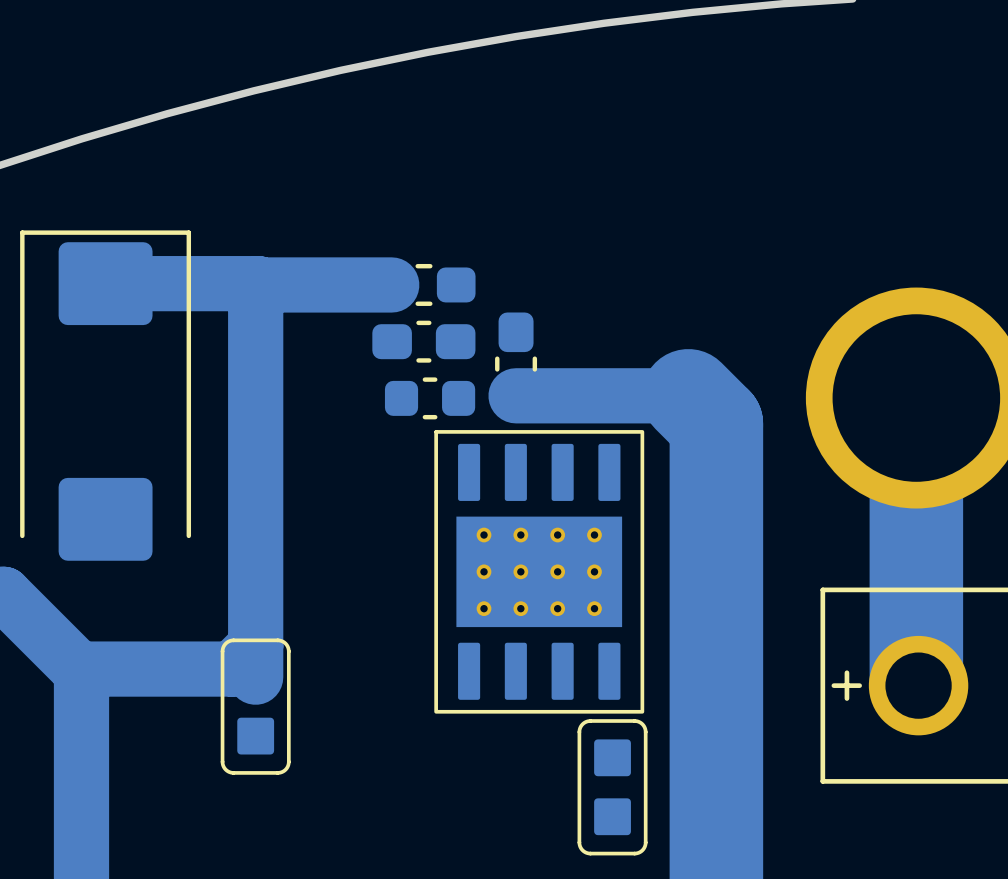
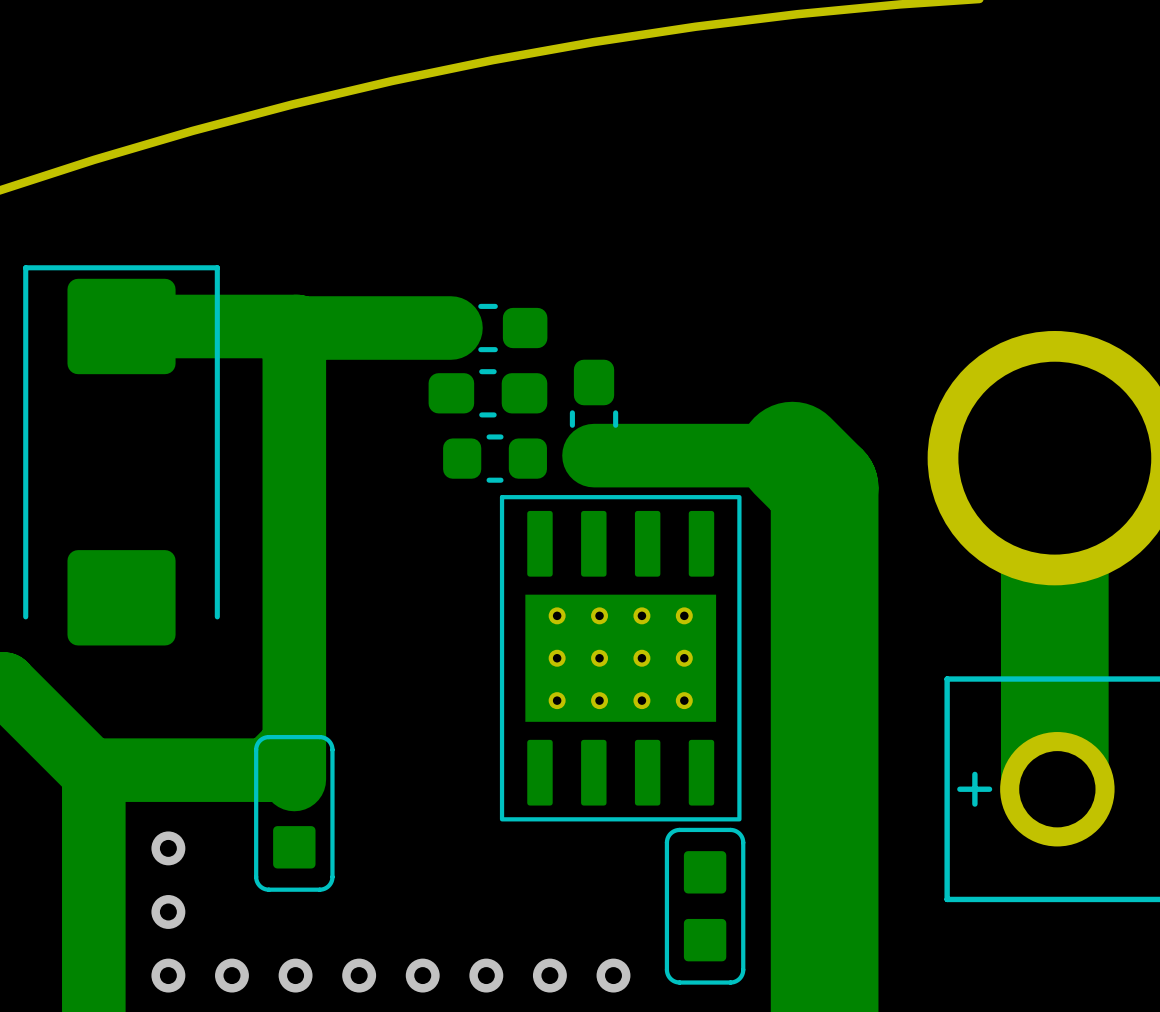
via: none -> (168, 848)
via: none -> (168, 911)
via: none -> (168, 975)
via: none -> (231, 975)
via: none -> (295, 975)
via: none -> (359, 975)
via: none -> (422, 975)
via: none -> (486, 975)
via: none -> (549, 975)
via: none -> (613, 975)

